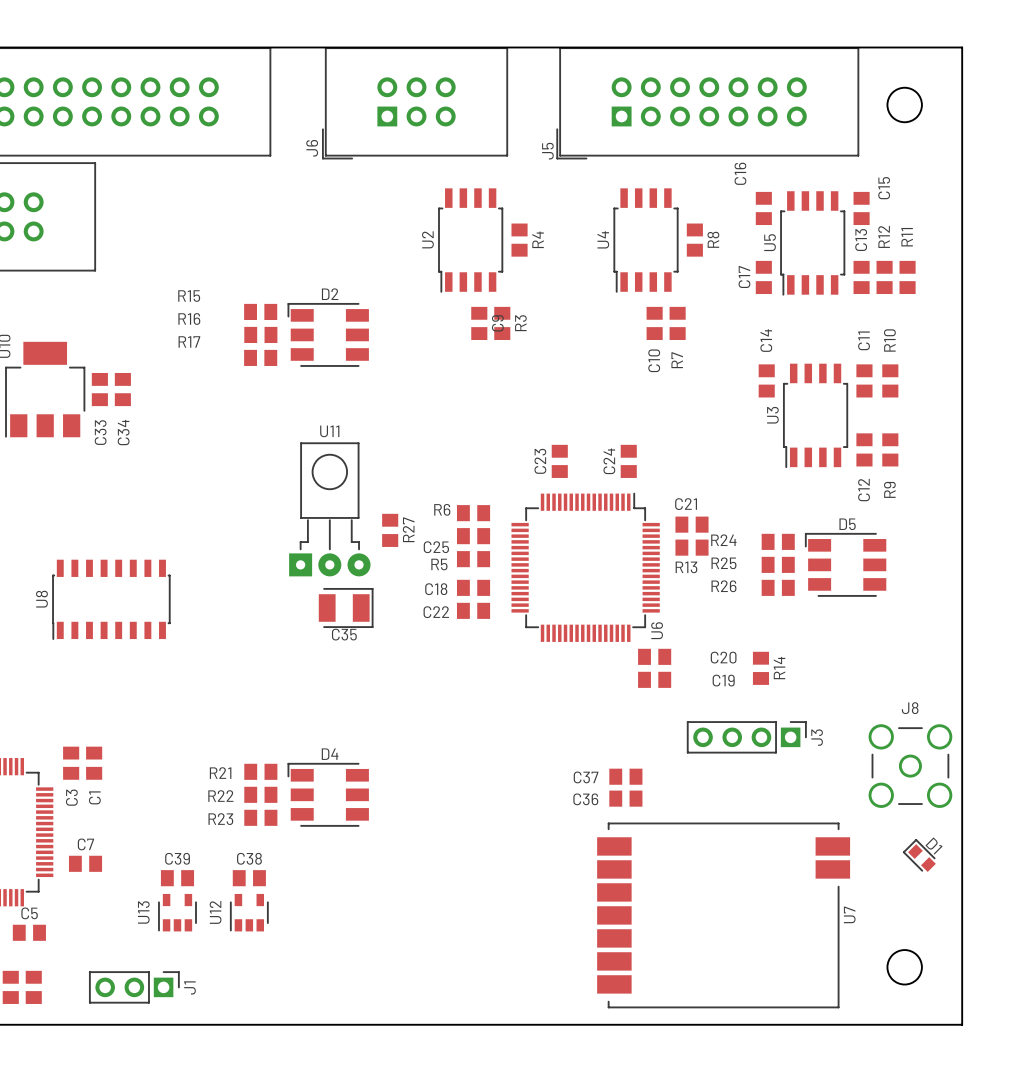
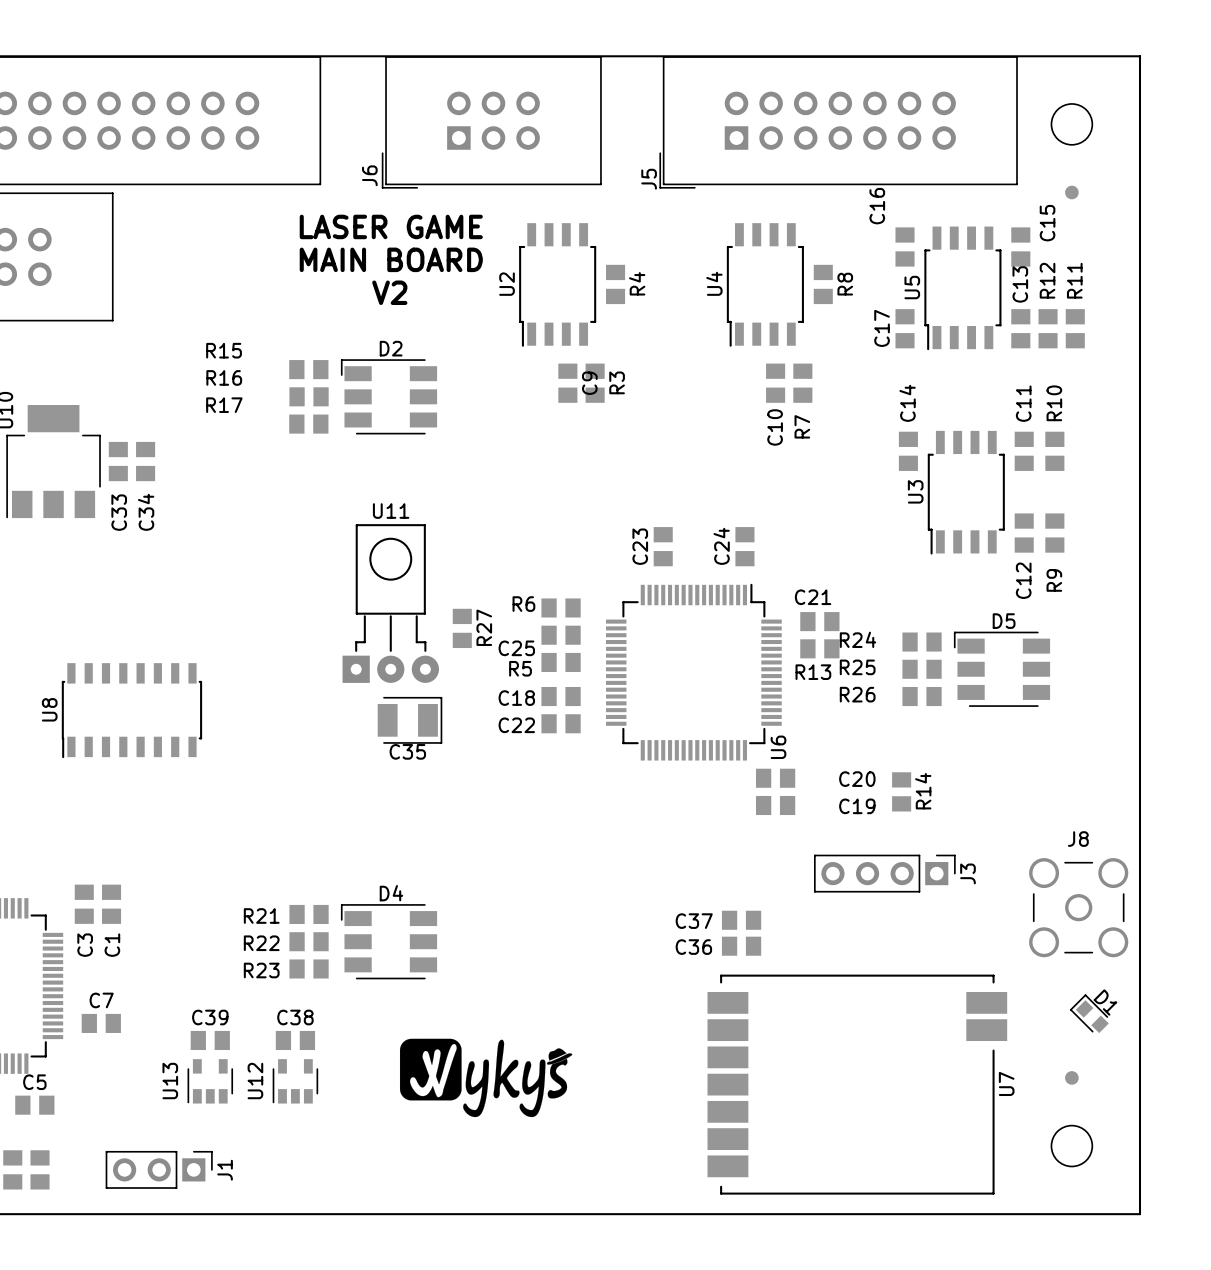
part: none -> (1071, 192)
text: none -> LASER GAME (391, 226)
text: none -> MAIN BOARD (391, 259)
text: none -> V2 (389, 292)
drawing: none -> [399, 1038, 573, 1118]
part: none -> (1071, 1077)

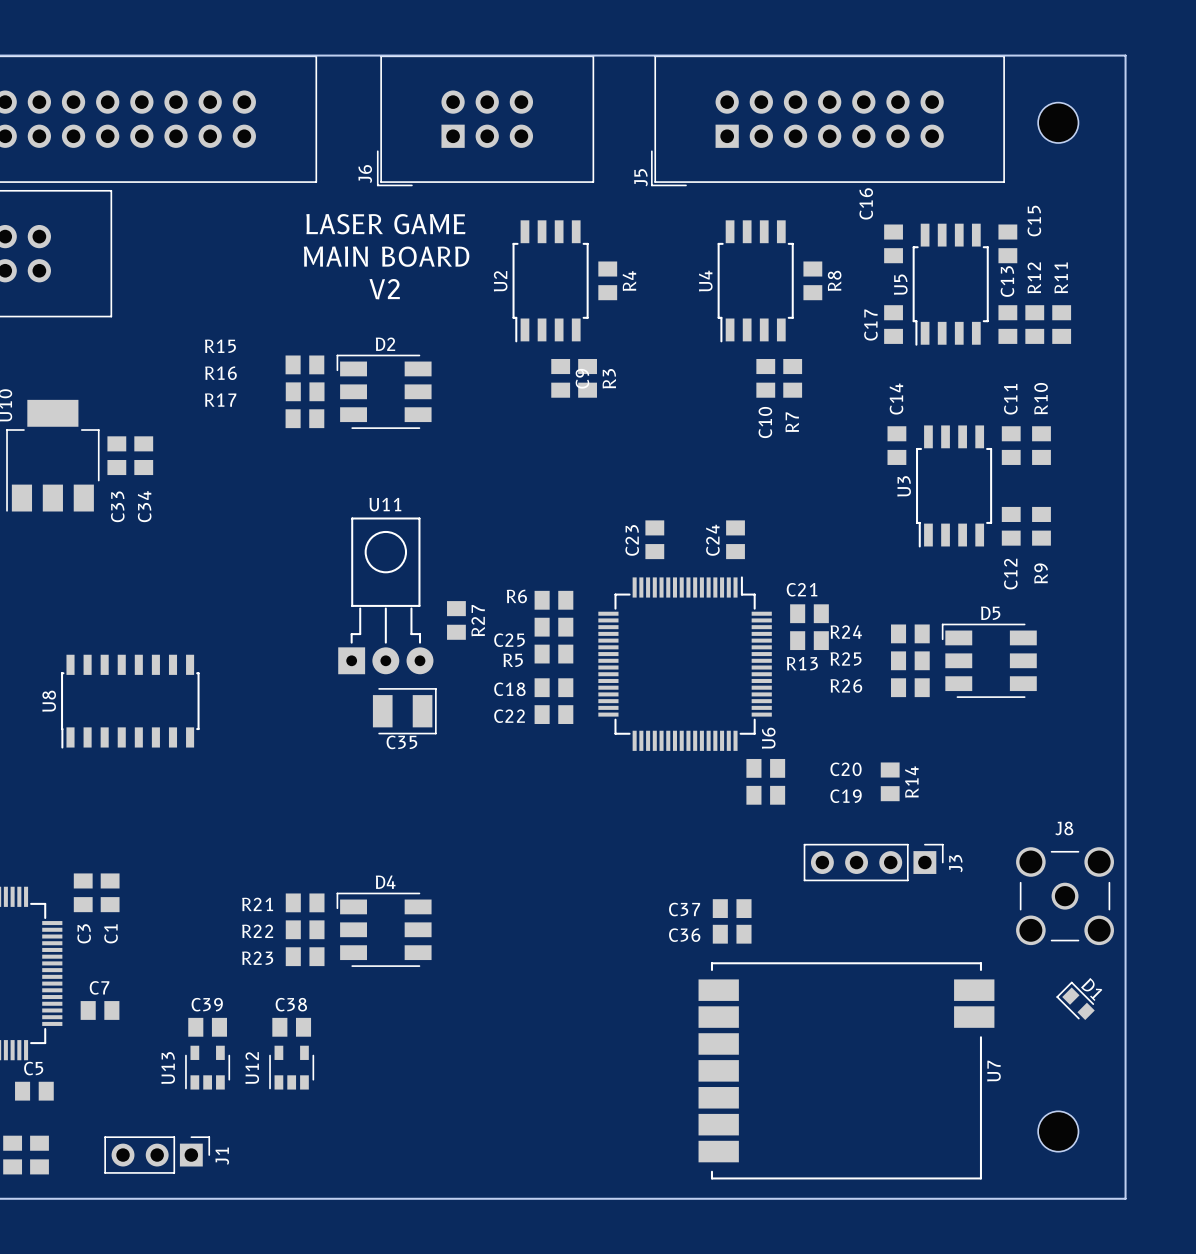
part: (1071, 192) -> none
drawing: [399, 1038, 573, 1118] -> none
part: (1071, 1077) -> none

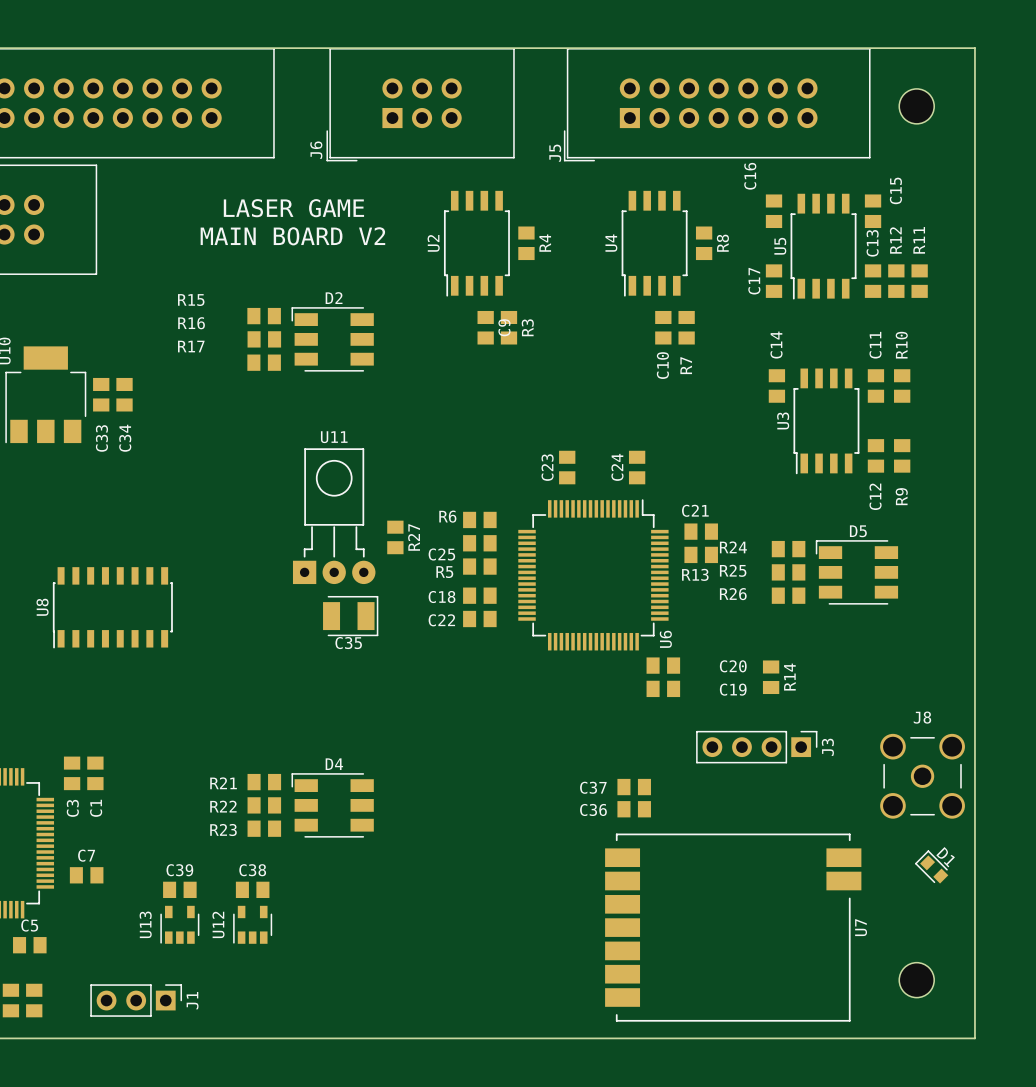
text position: LASER GAME (385, 224) -> LASER GAME (293, 208)
text: MAIN BOARD (386, 256) -> MAIN BOARD V2 (292, 236)
text: V2 (384, 289) -> none

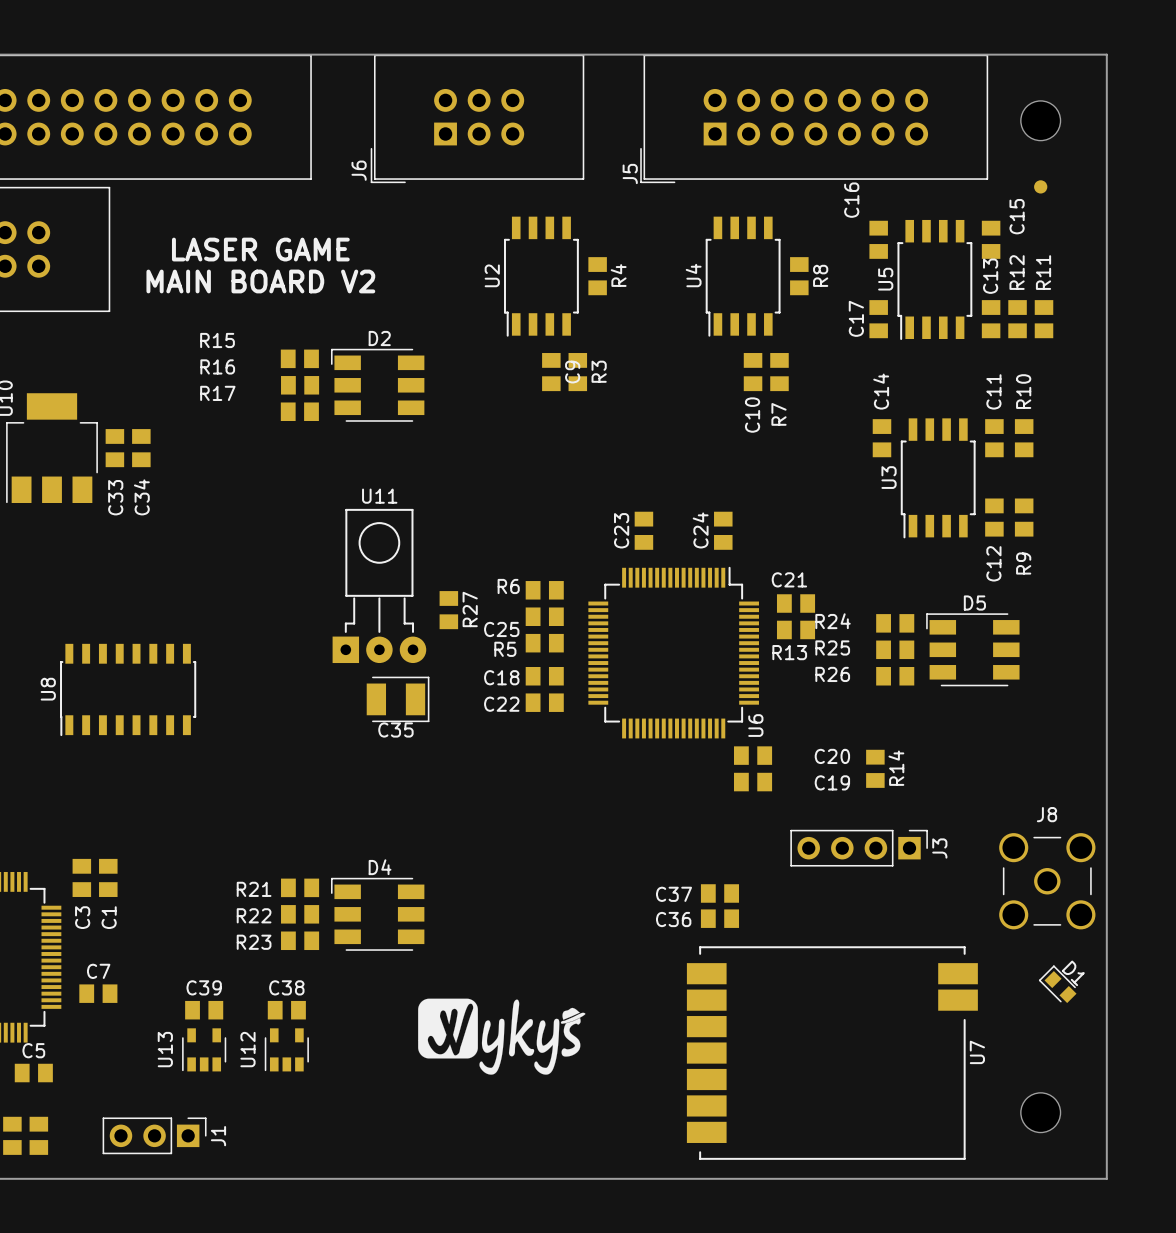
part: none -> (1040, 186)
text position: LASER GAME (293, 208) -> LASER GAME (260, 249)
text position: MAIN BOARD V2 (292, 236) -> MAIN BOARD V2 (260, 281)
drawing: none -> [418, 998, 586, 1075]

